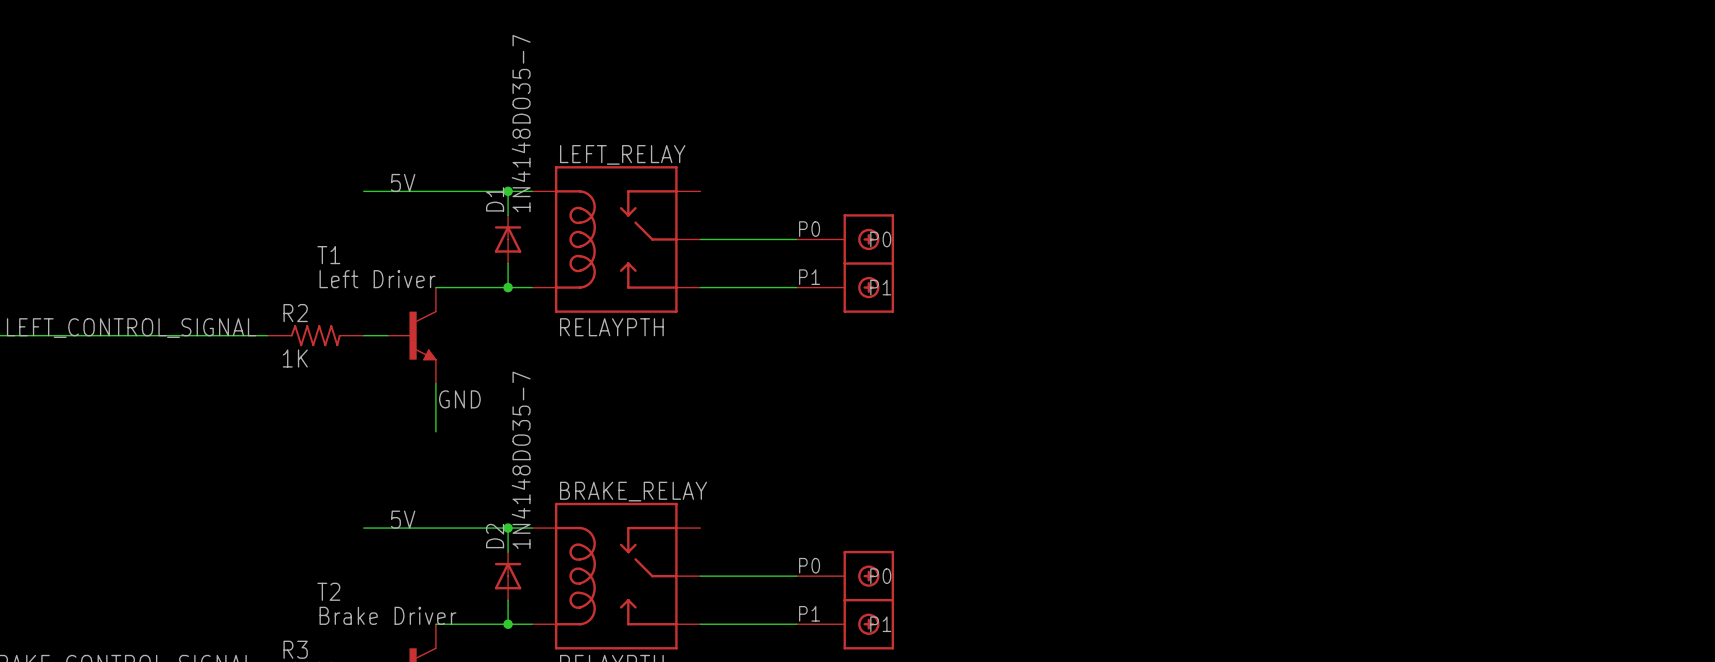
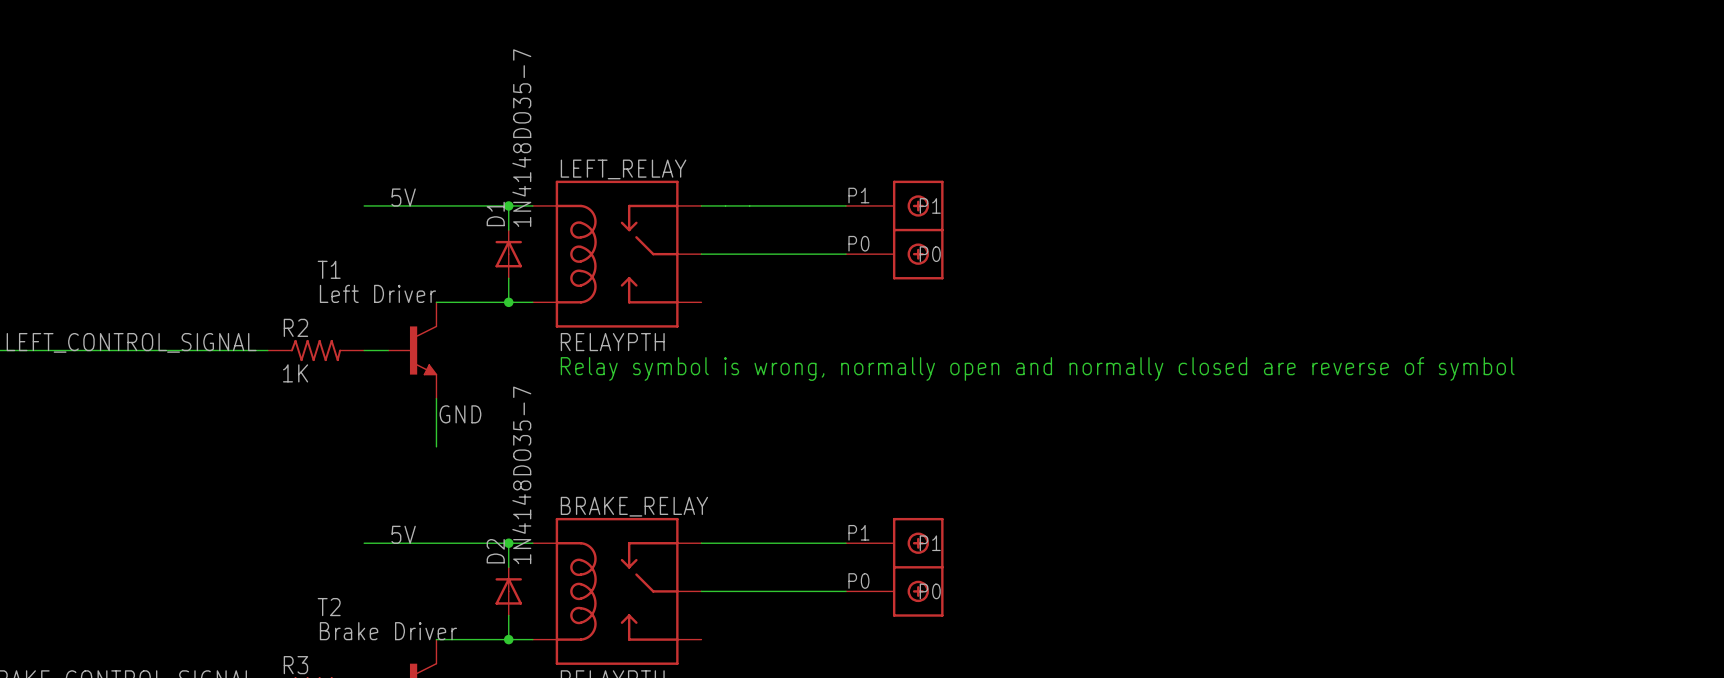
wire: none -> (701, 205) (845, 205)
part: none -> (894, 230)
part: (845, 263) -> none
wire: (700, 287) (796, 287) -> none
text: none -> Relay symbol is wrong, normally open and normally closed are reverse of symbol (1037, 368)
wire: none -> (701, 543) (845, 543)
part: none -> (894, 567)
part: (845, 600) -> none
wire: (700, 624) (796, 624) -> none

